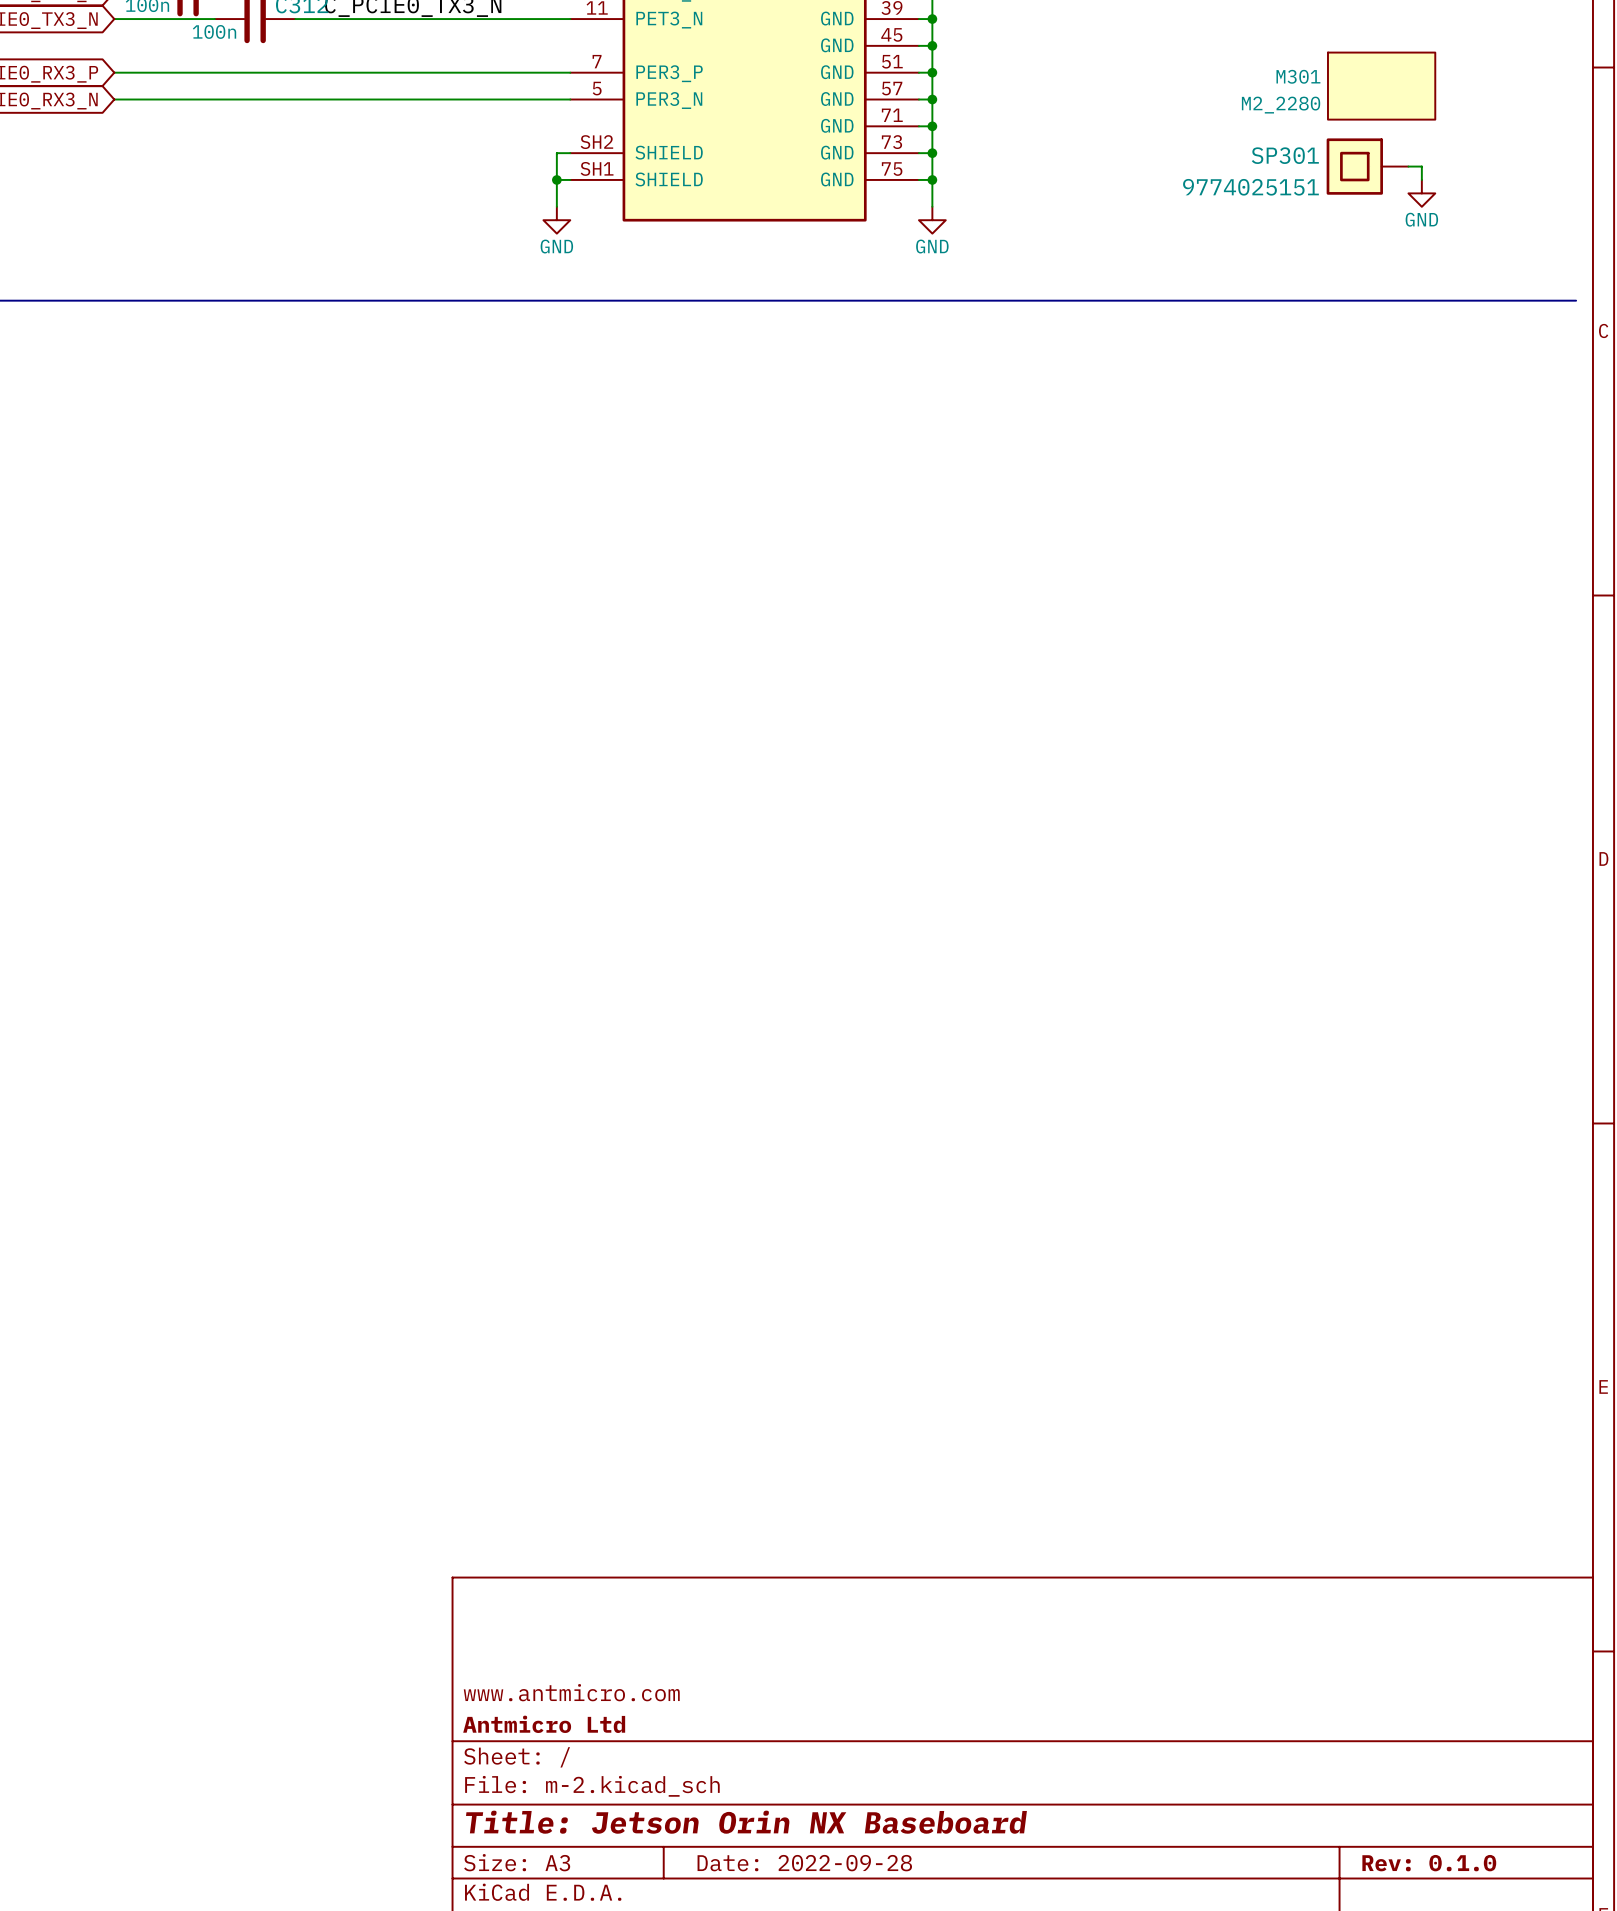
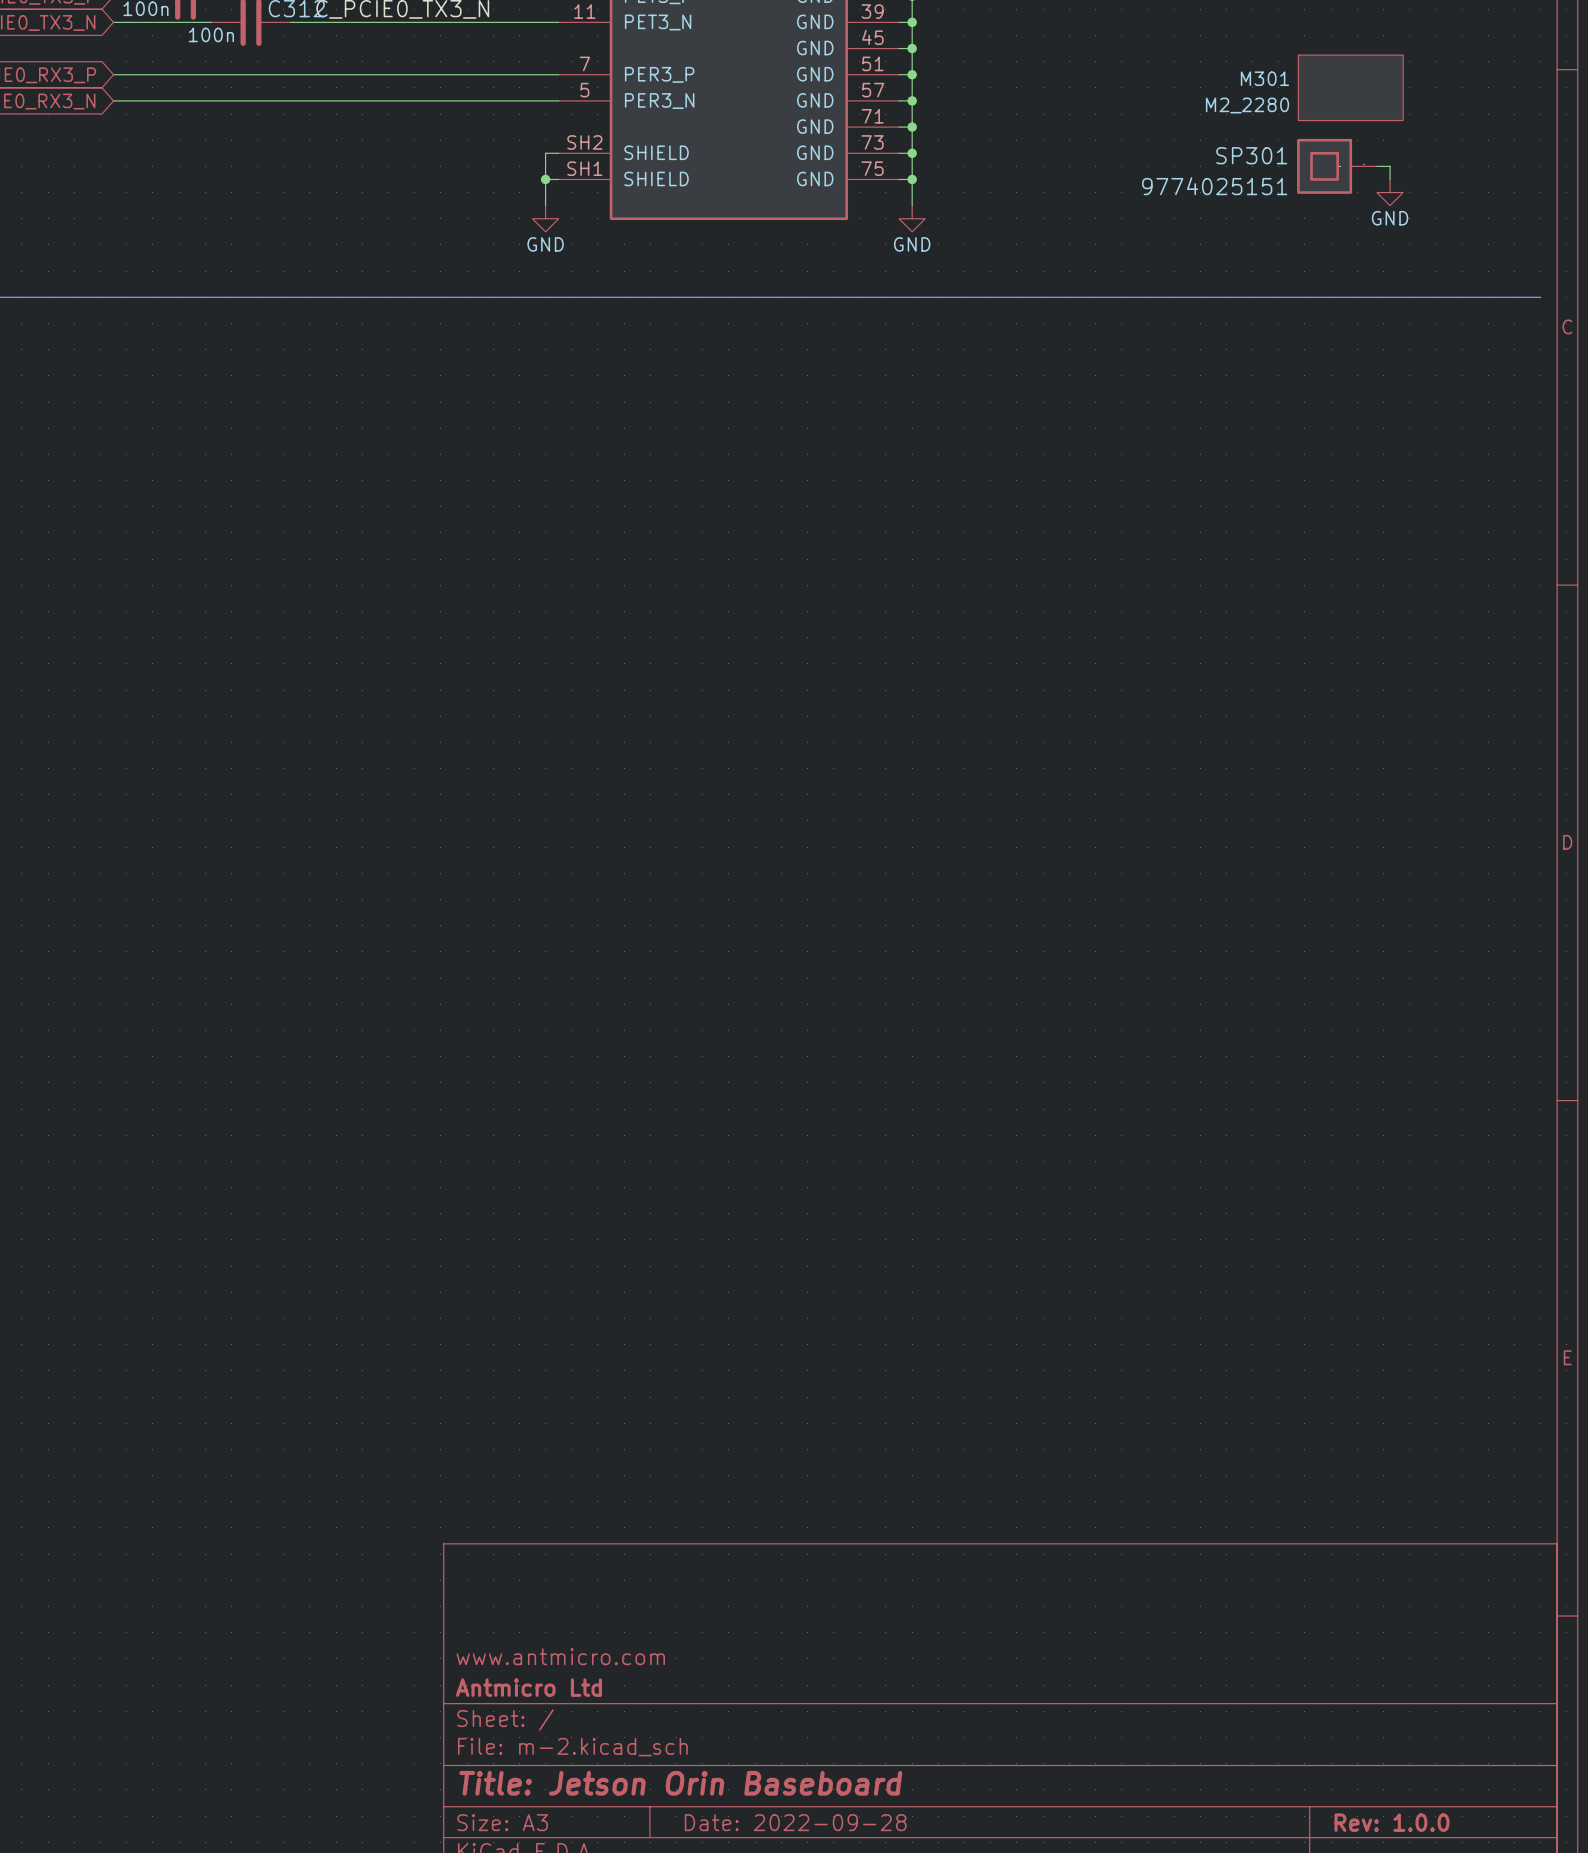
title block: Title: Jetson Orin NX Baseboard (746, 1822) -> Title: Jetson Orin Baseboard (680, 1783)
title block: Rev: 0.1.0 (1429, 1863) -> Rev: 1.0.0 (1391, 1822)

